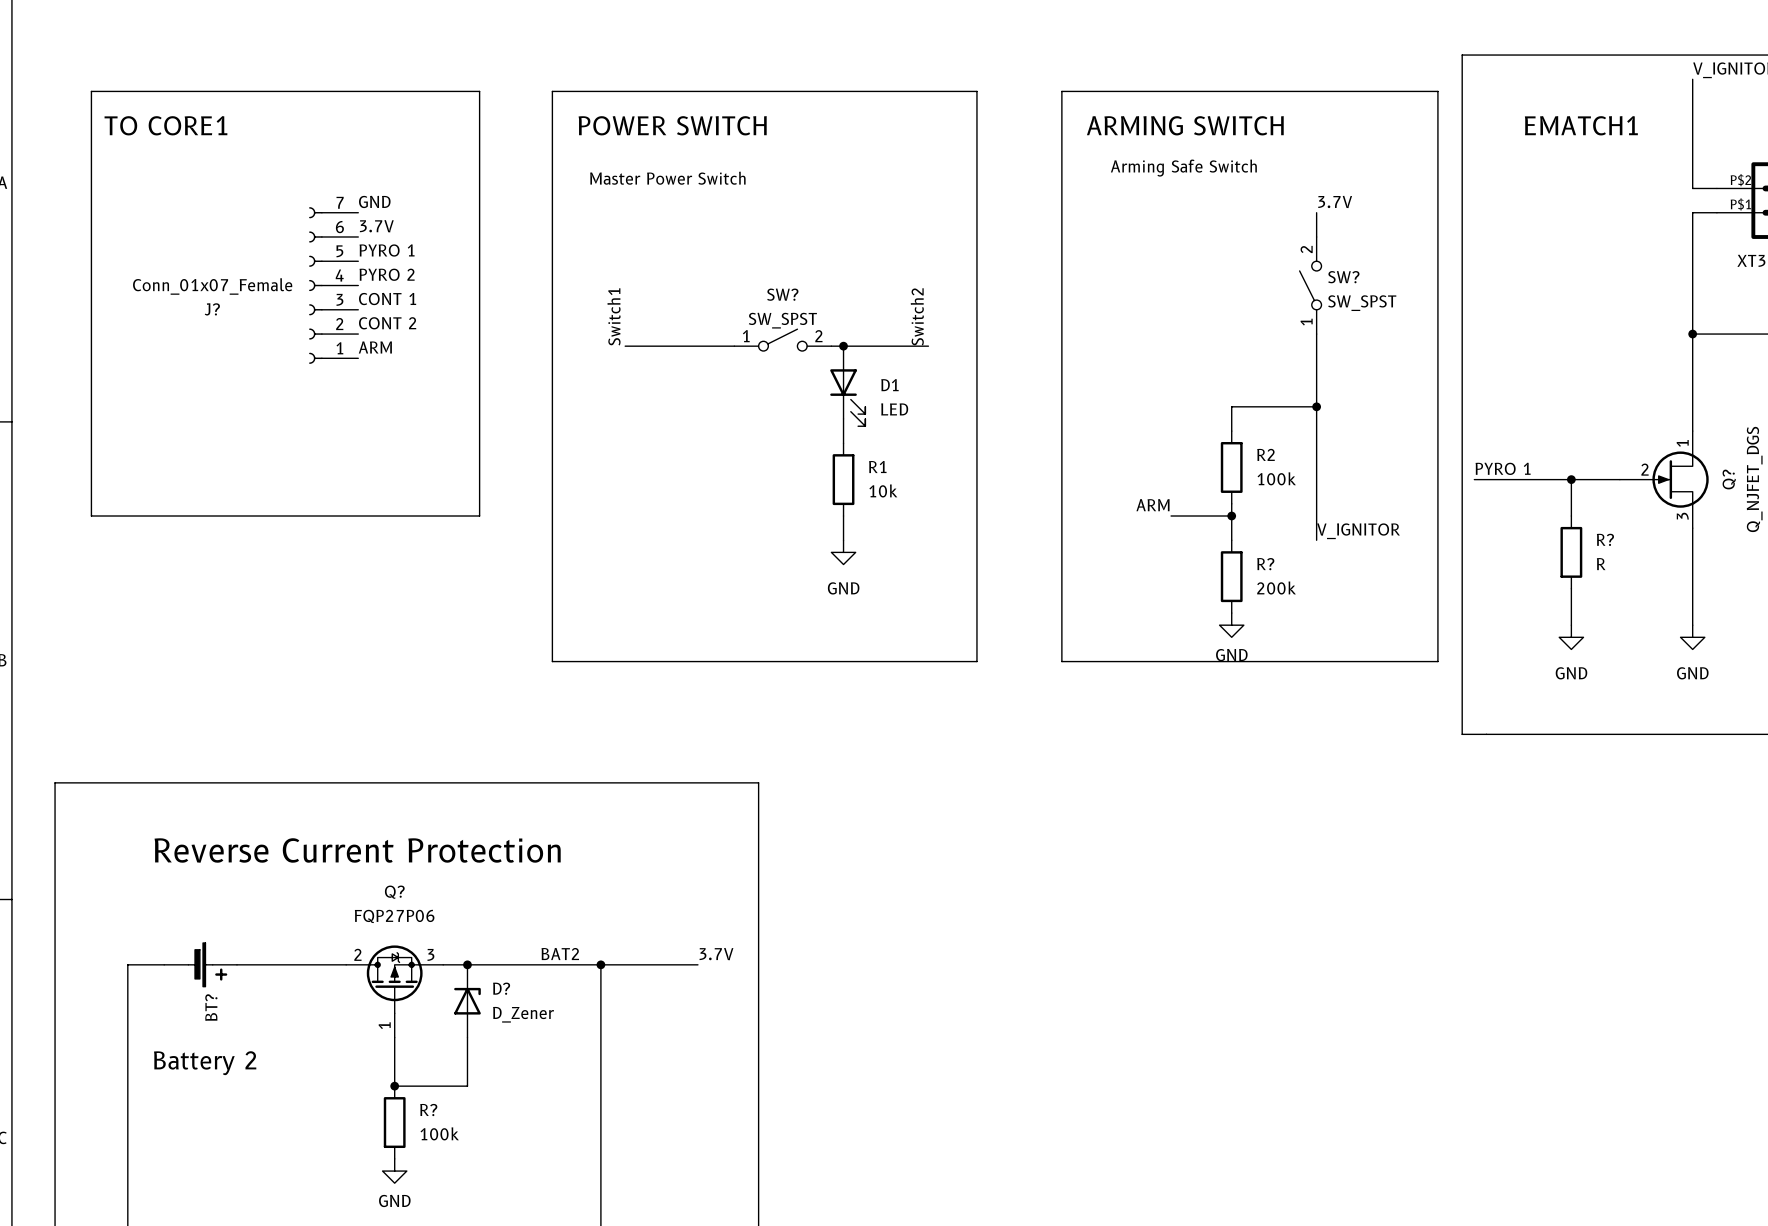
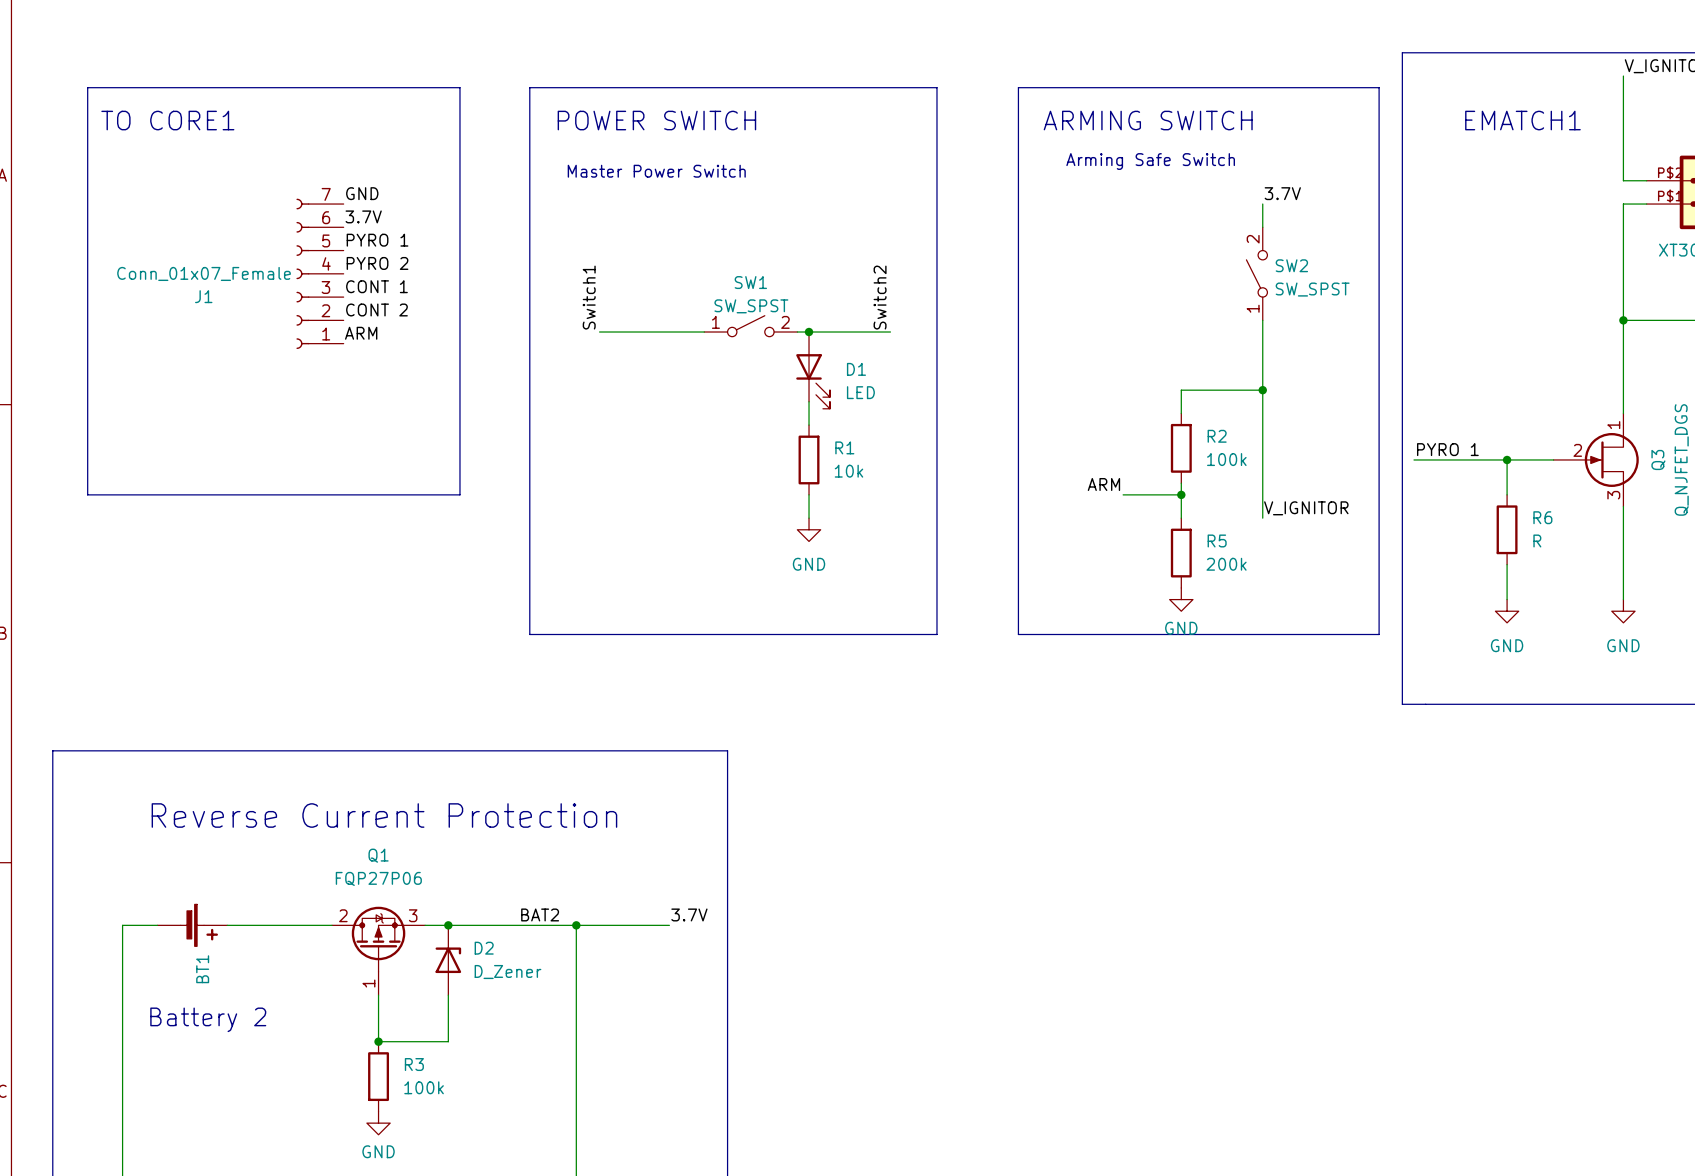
SW? name: SW? (1343, 277) -> SW2 (1291, 265)
SW? name: SW? (782, 294) -> SW1 (750, 282)
J? name: J? (212, 309) -> J1 (203, 296)
Q? name: Q? (1729, 479) -> Q3 (1658, 459)
R? name: R? (1605, 539) -> R6 (1542, 517)
R? name: R? (1265, 564) -> R5 (1217, 540)
Q? name: Q? (394, 892) -> Q1 (378, 855)
D? name: D? (501, 988) -> D2 (484, 948)
BT? name: BT? (211, 1007) -> BT1 (202, 969)
R? name: R? (428, 1110) -> R3 (414, 1064)

